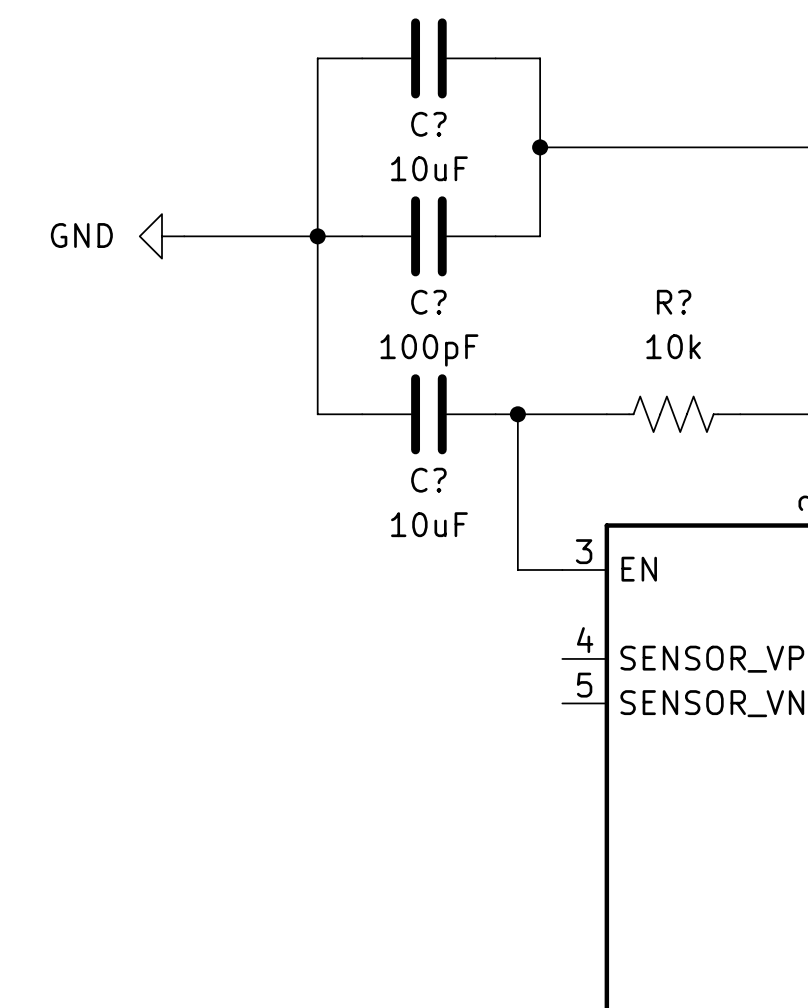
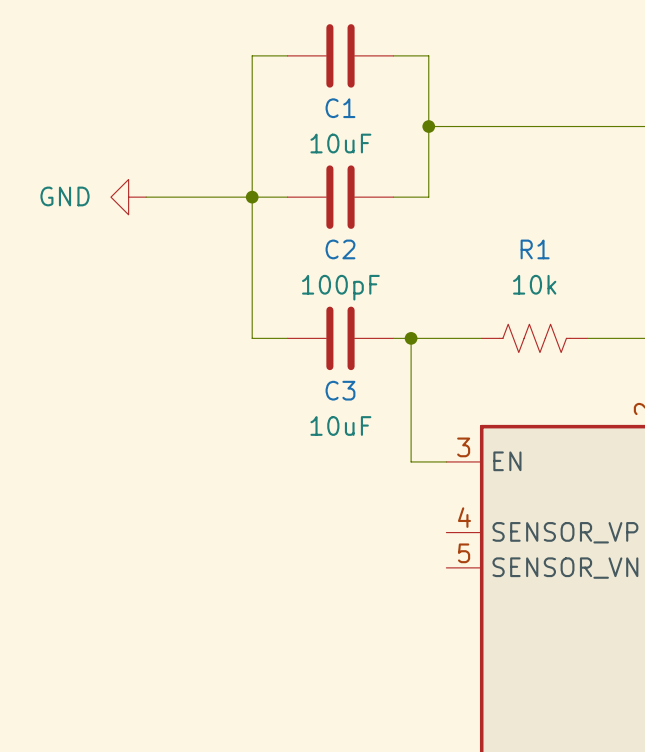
C? name: C? (428, 124) -> C1 (340, 108)
C? name: C? (428, 302) -> C2 (340, 249)
R? name: R? (674, 302) -> R1 (535, 249)
C? name: C? (428, 480) -> C3 (340, 390)

